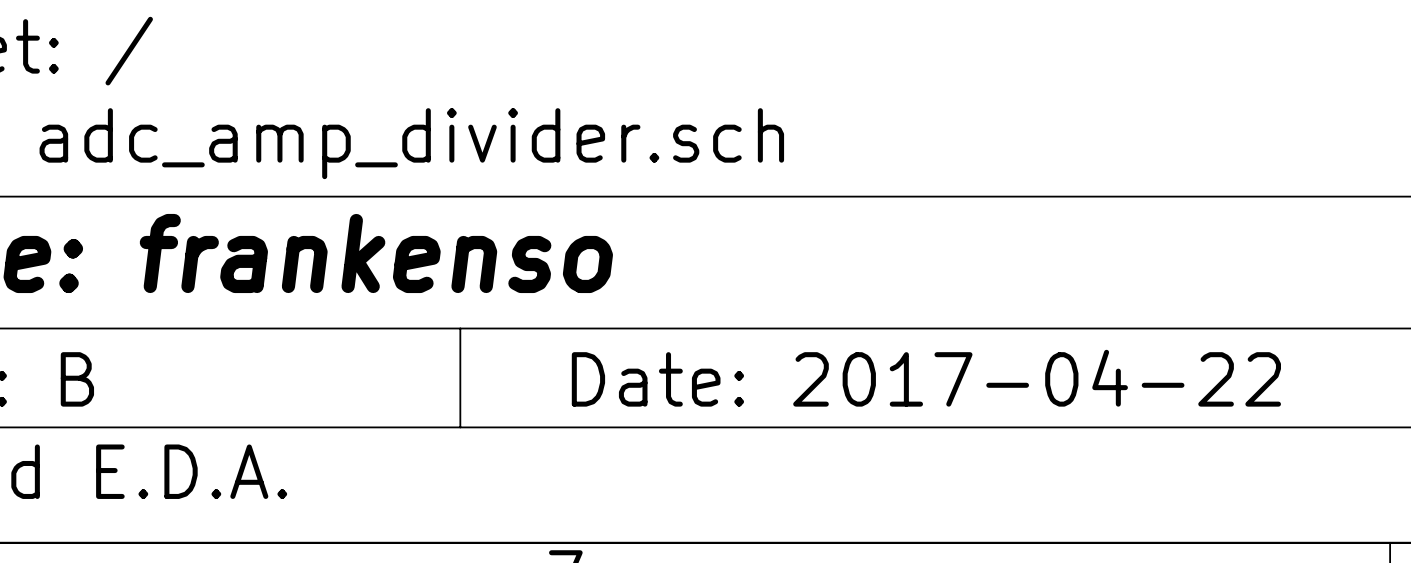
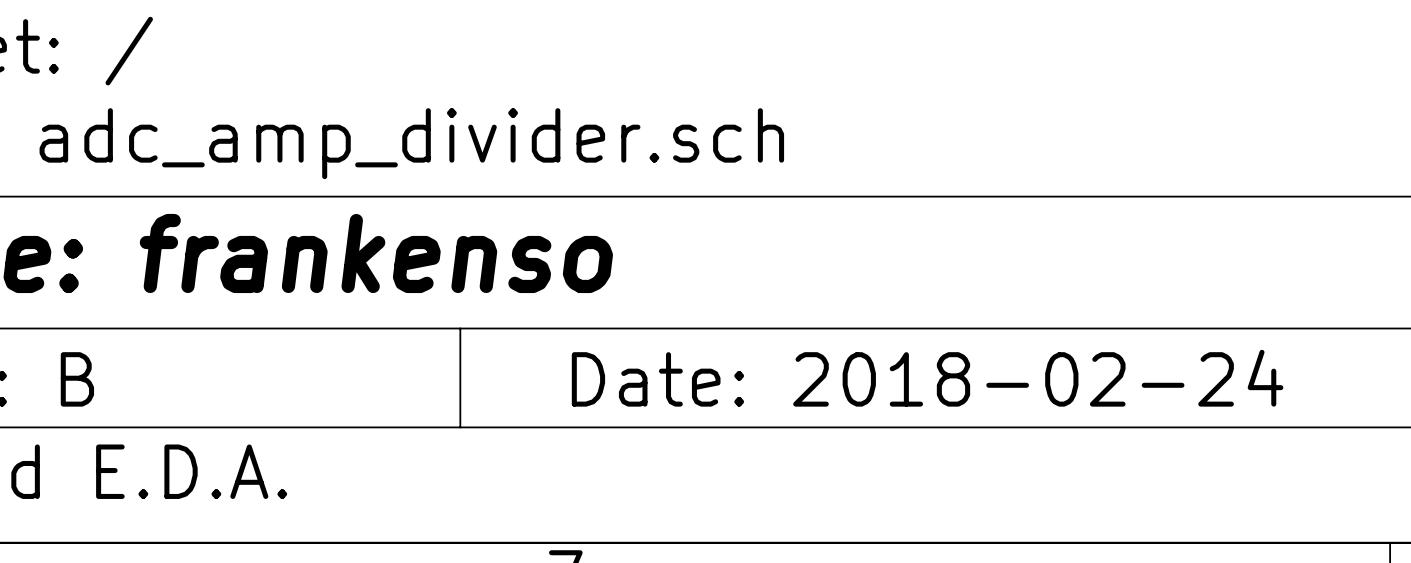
title block: Date: 2017-04-22 (926, 378) -> Date: 2018-02-24 (927, 378)

